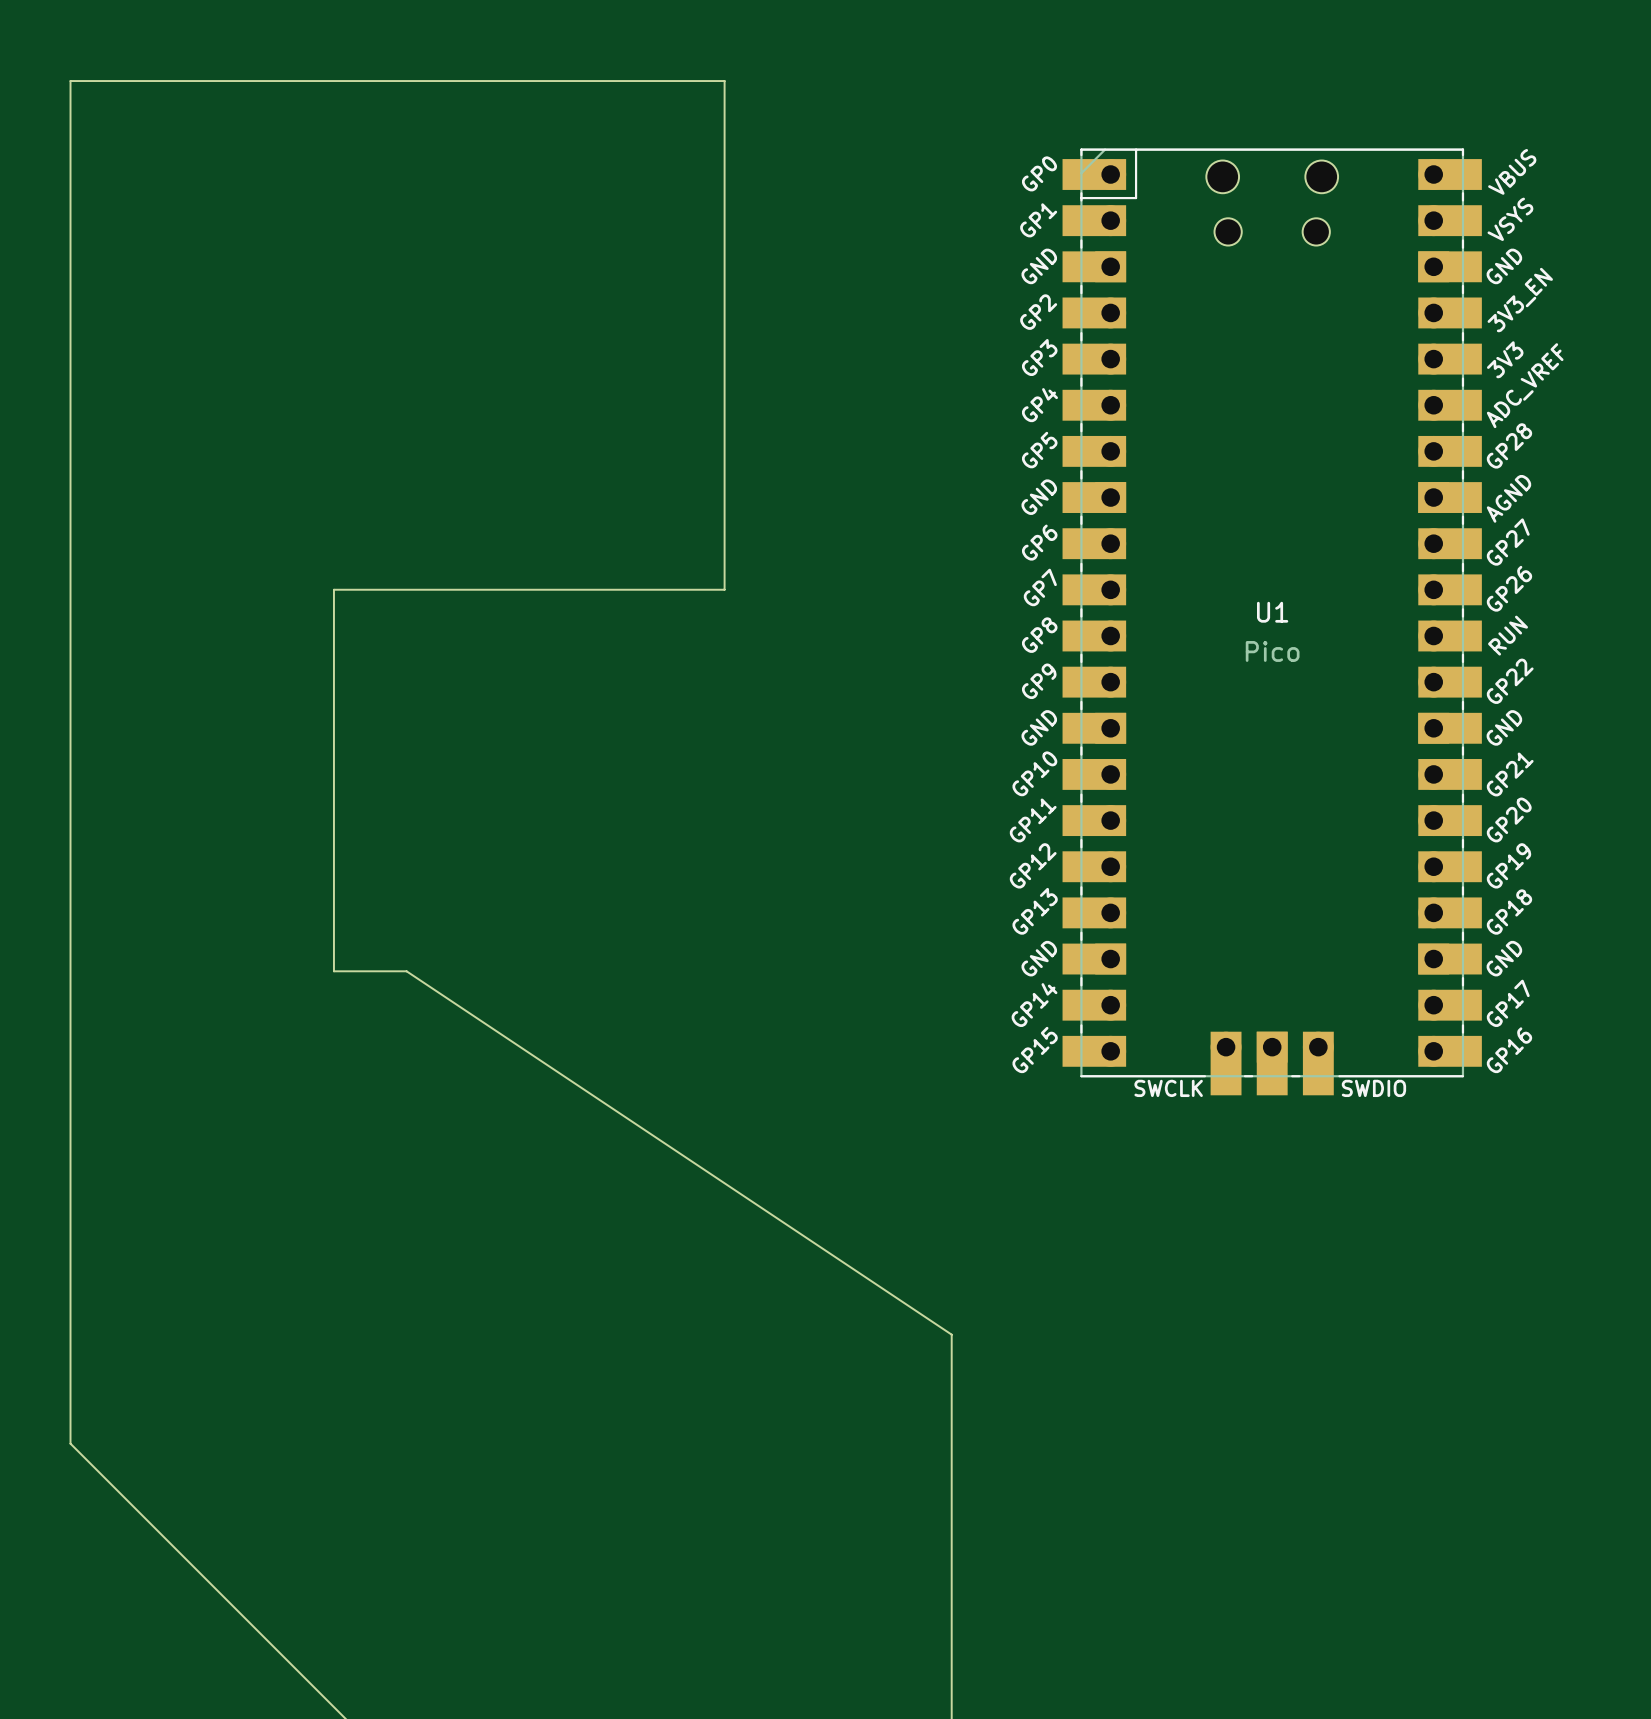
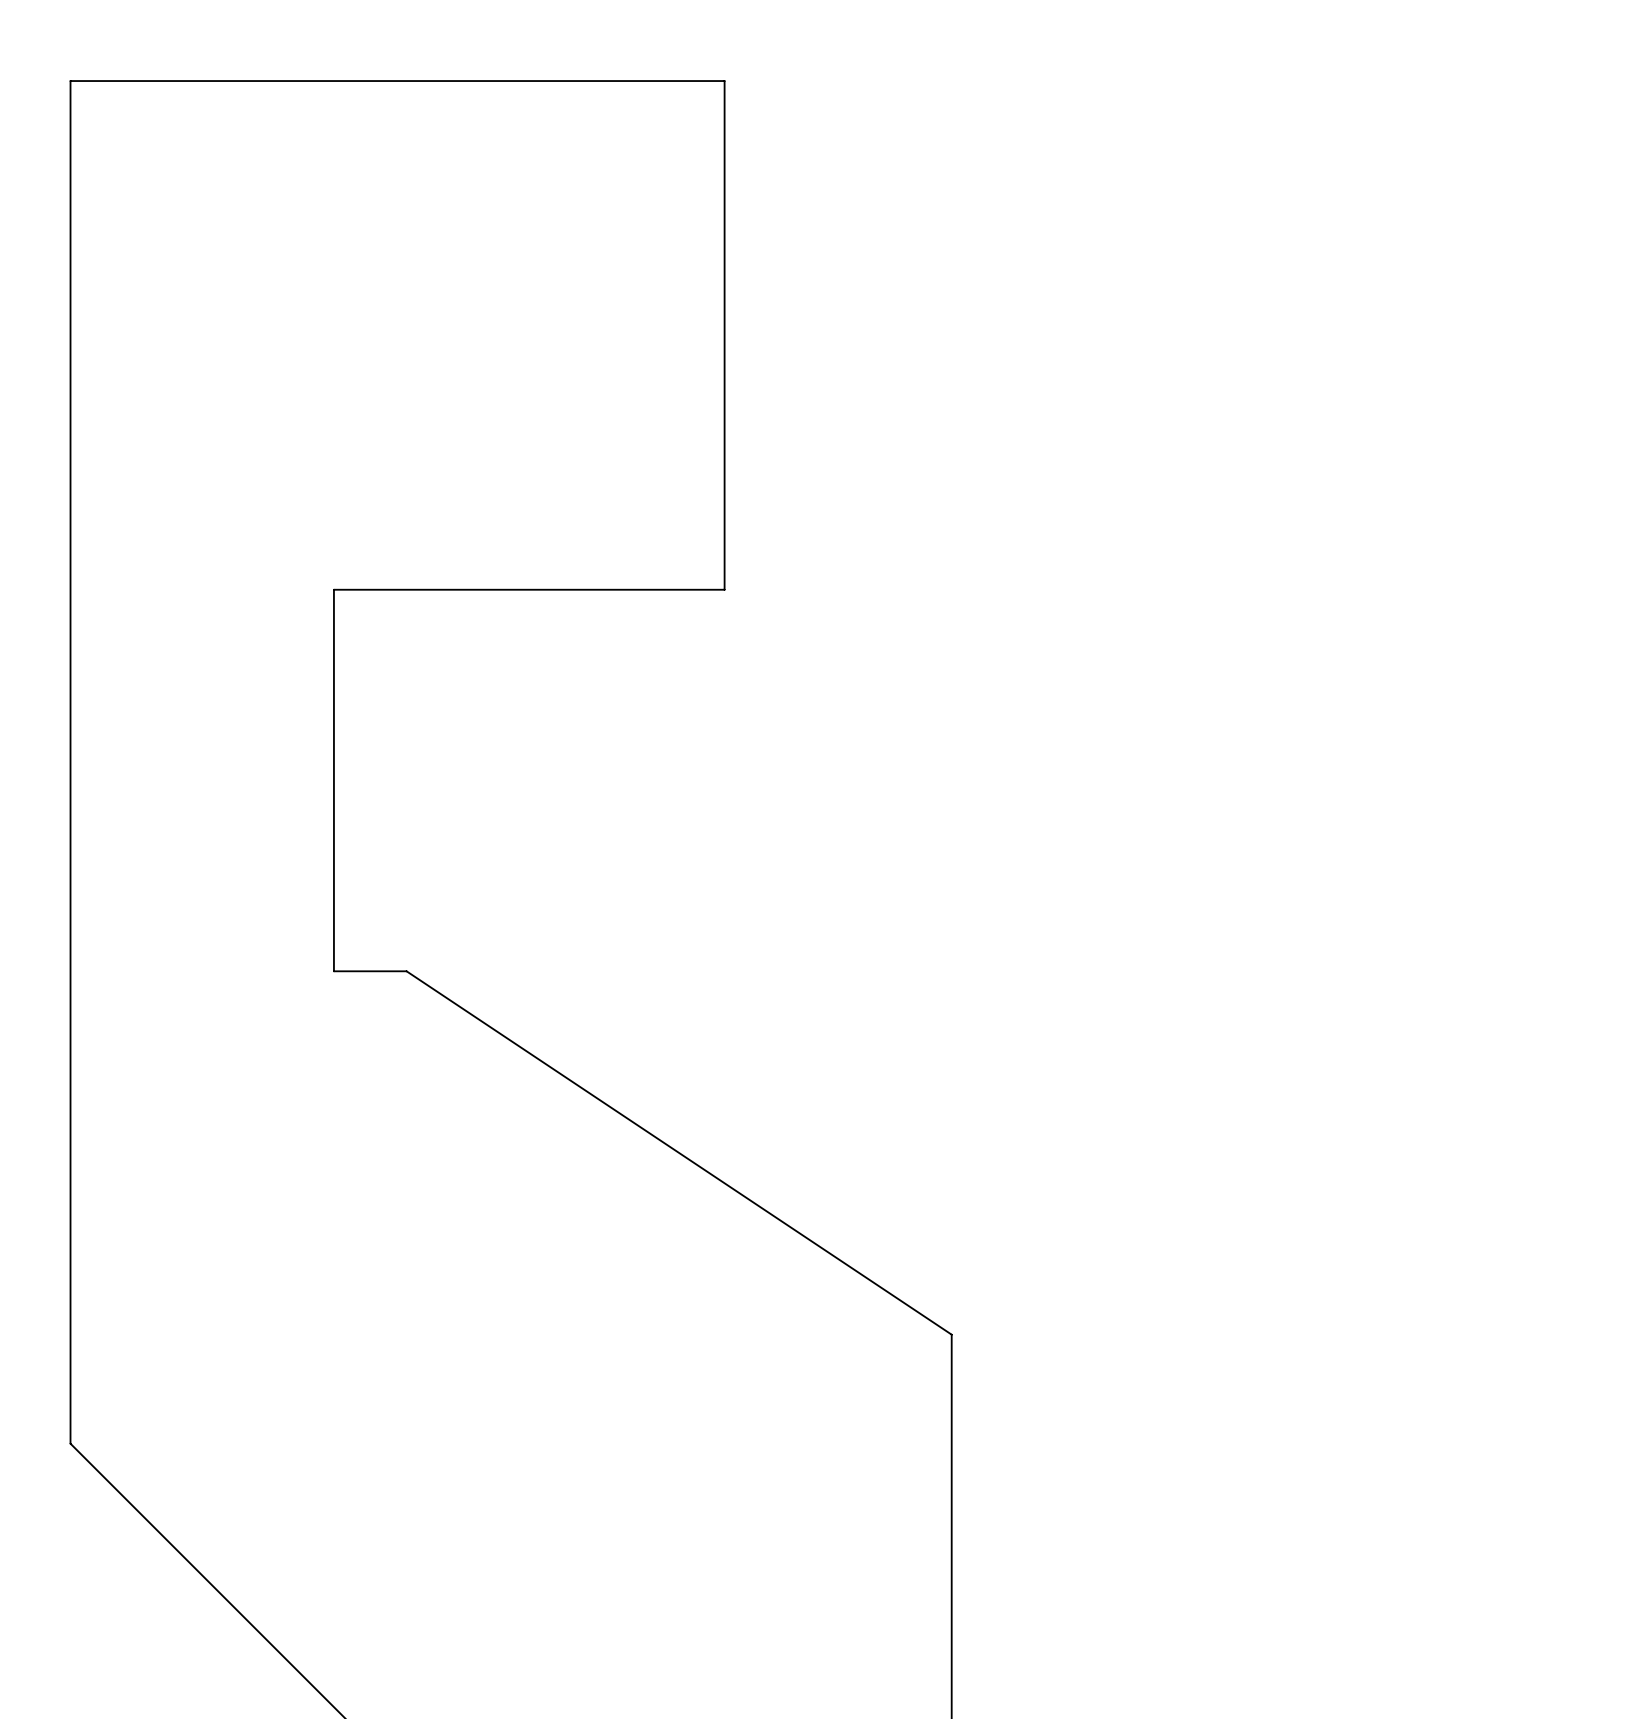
U1: Pico (1272, 621) -> none

